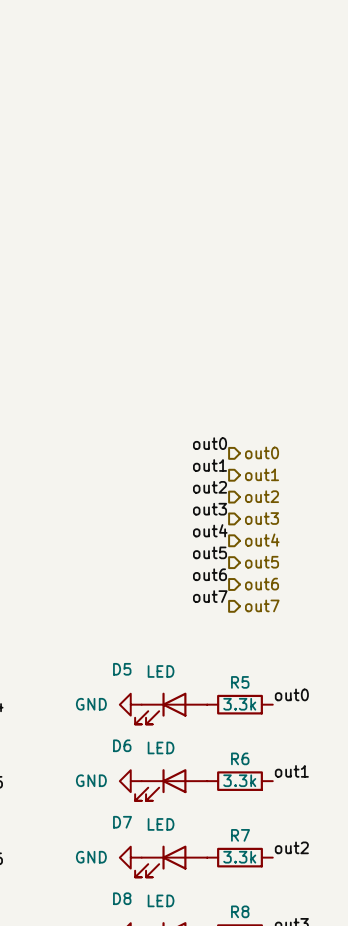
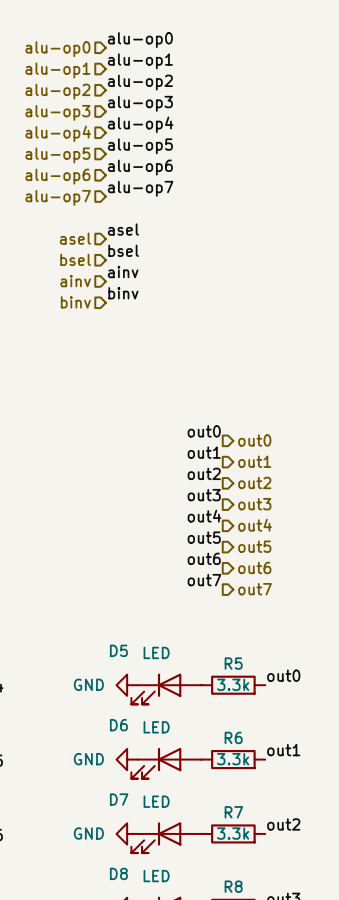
label: none -> alu-op0 (140, 40)
hierarchical label: none -> alu-op0 (57, 49)
label: none -> alu-op1 (140, 61)
hierarchical label: none -> alu-op1 (57, 70)
label: none -> alu-op2 (140, 82)
hierarchical label: none -> alu-op2 (57, 91)
label: none -> alu-op3 (140, 103)
hierarchical label: none -> alu-op3 (57, 112)
label: none -> alu-op4 (140, 124)
hierarchical label: none -> alu-op4 (58, 133)
label: none -> alu-op5 (140, 146)
hierarchical label: none -> alu-op5 (57, 155)
label: none -> alu-op6 (140, 167)
hierarchical label: none -> alu-op6 (57, 176)
label: none -> alu-op7 (140, 188)
hierarchical label: none -> alu-op7 (58, 197)
label: none -> asel (123, 229)
hierarchical label: none -> asel (75, 238)
label: none -> bsel (123, 250)
hierarchical label: none -> bsel (75, 259)
label: none -> ainv (123, 272)
hierarchical label: none -> ainv (75, 281)
label: none -> binv (123, 293)
hierarchical label: none -> binv (75, 302)

